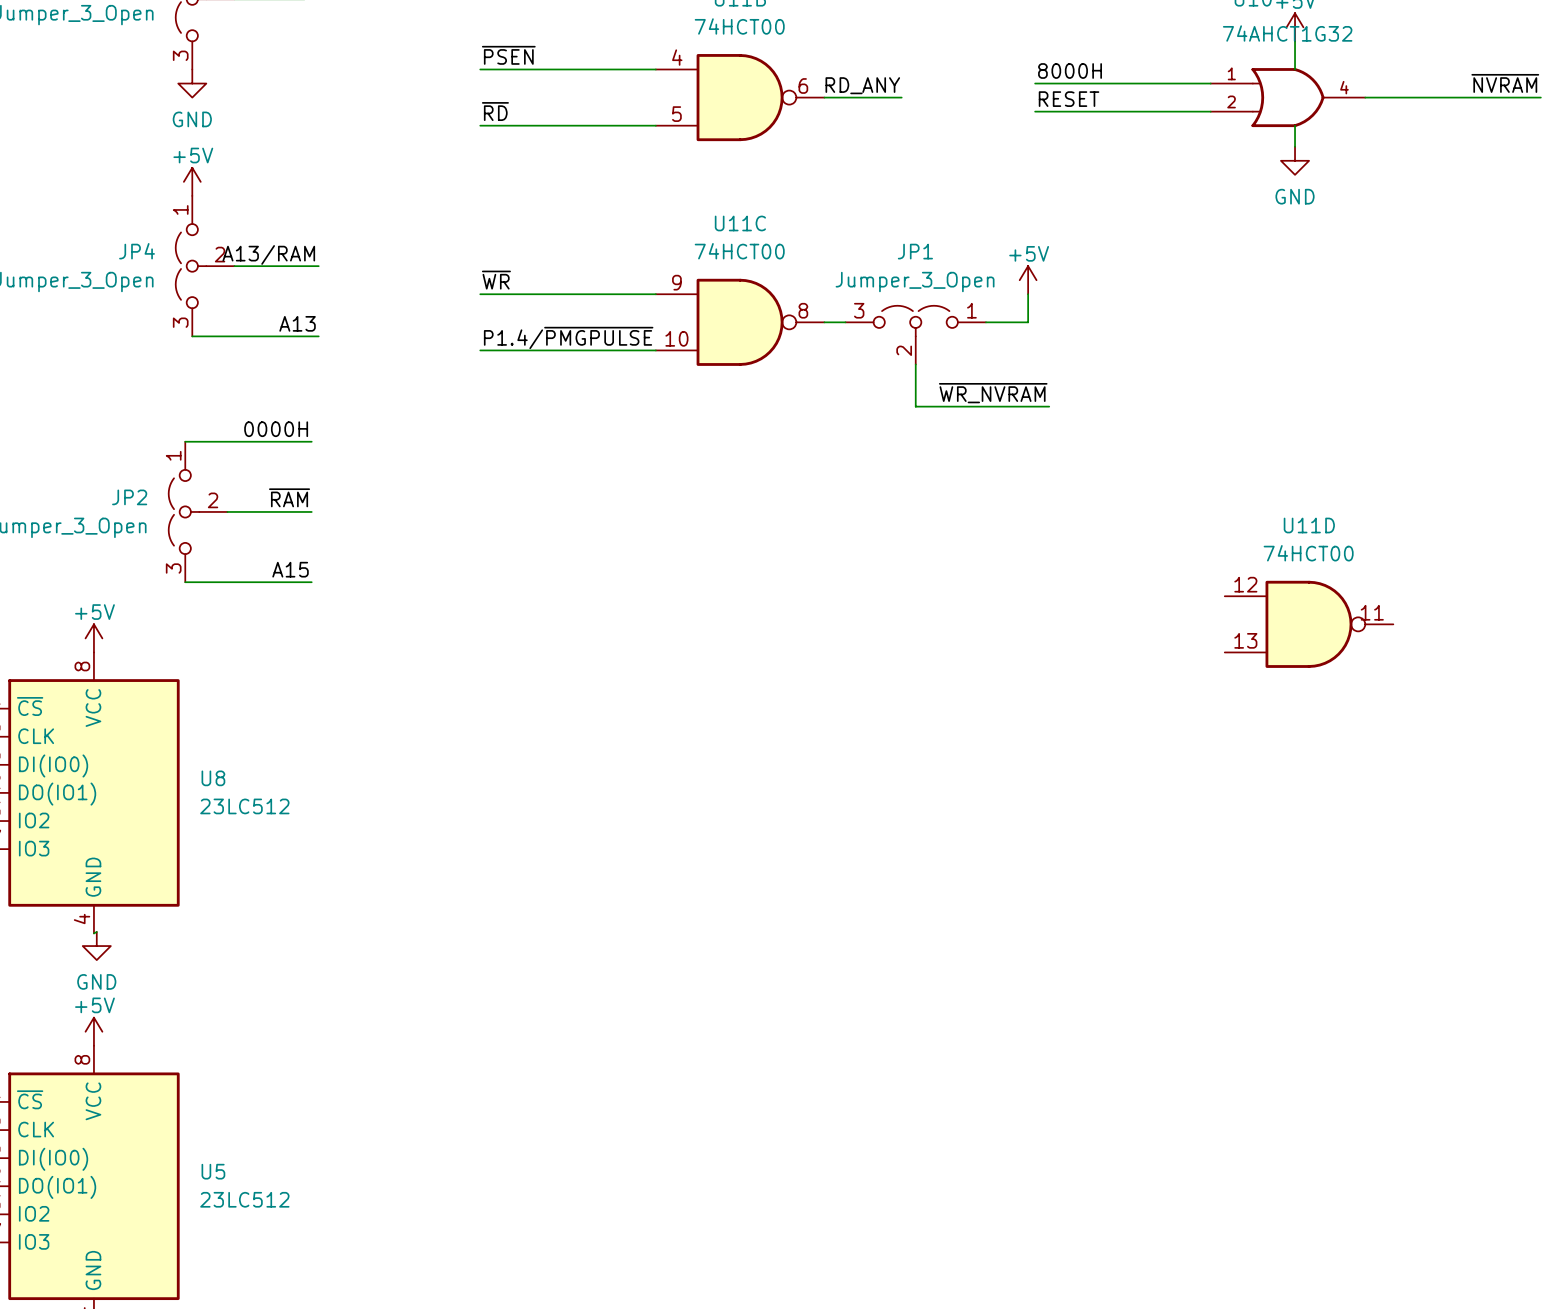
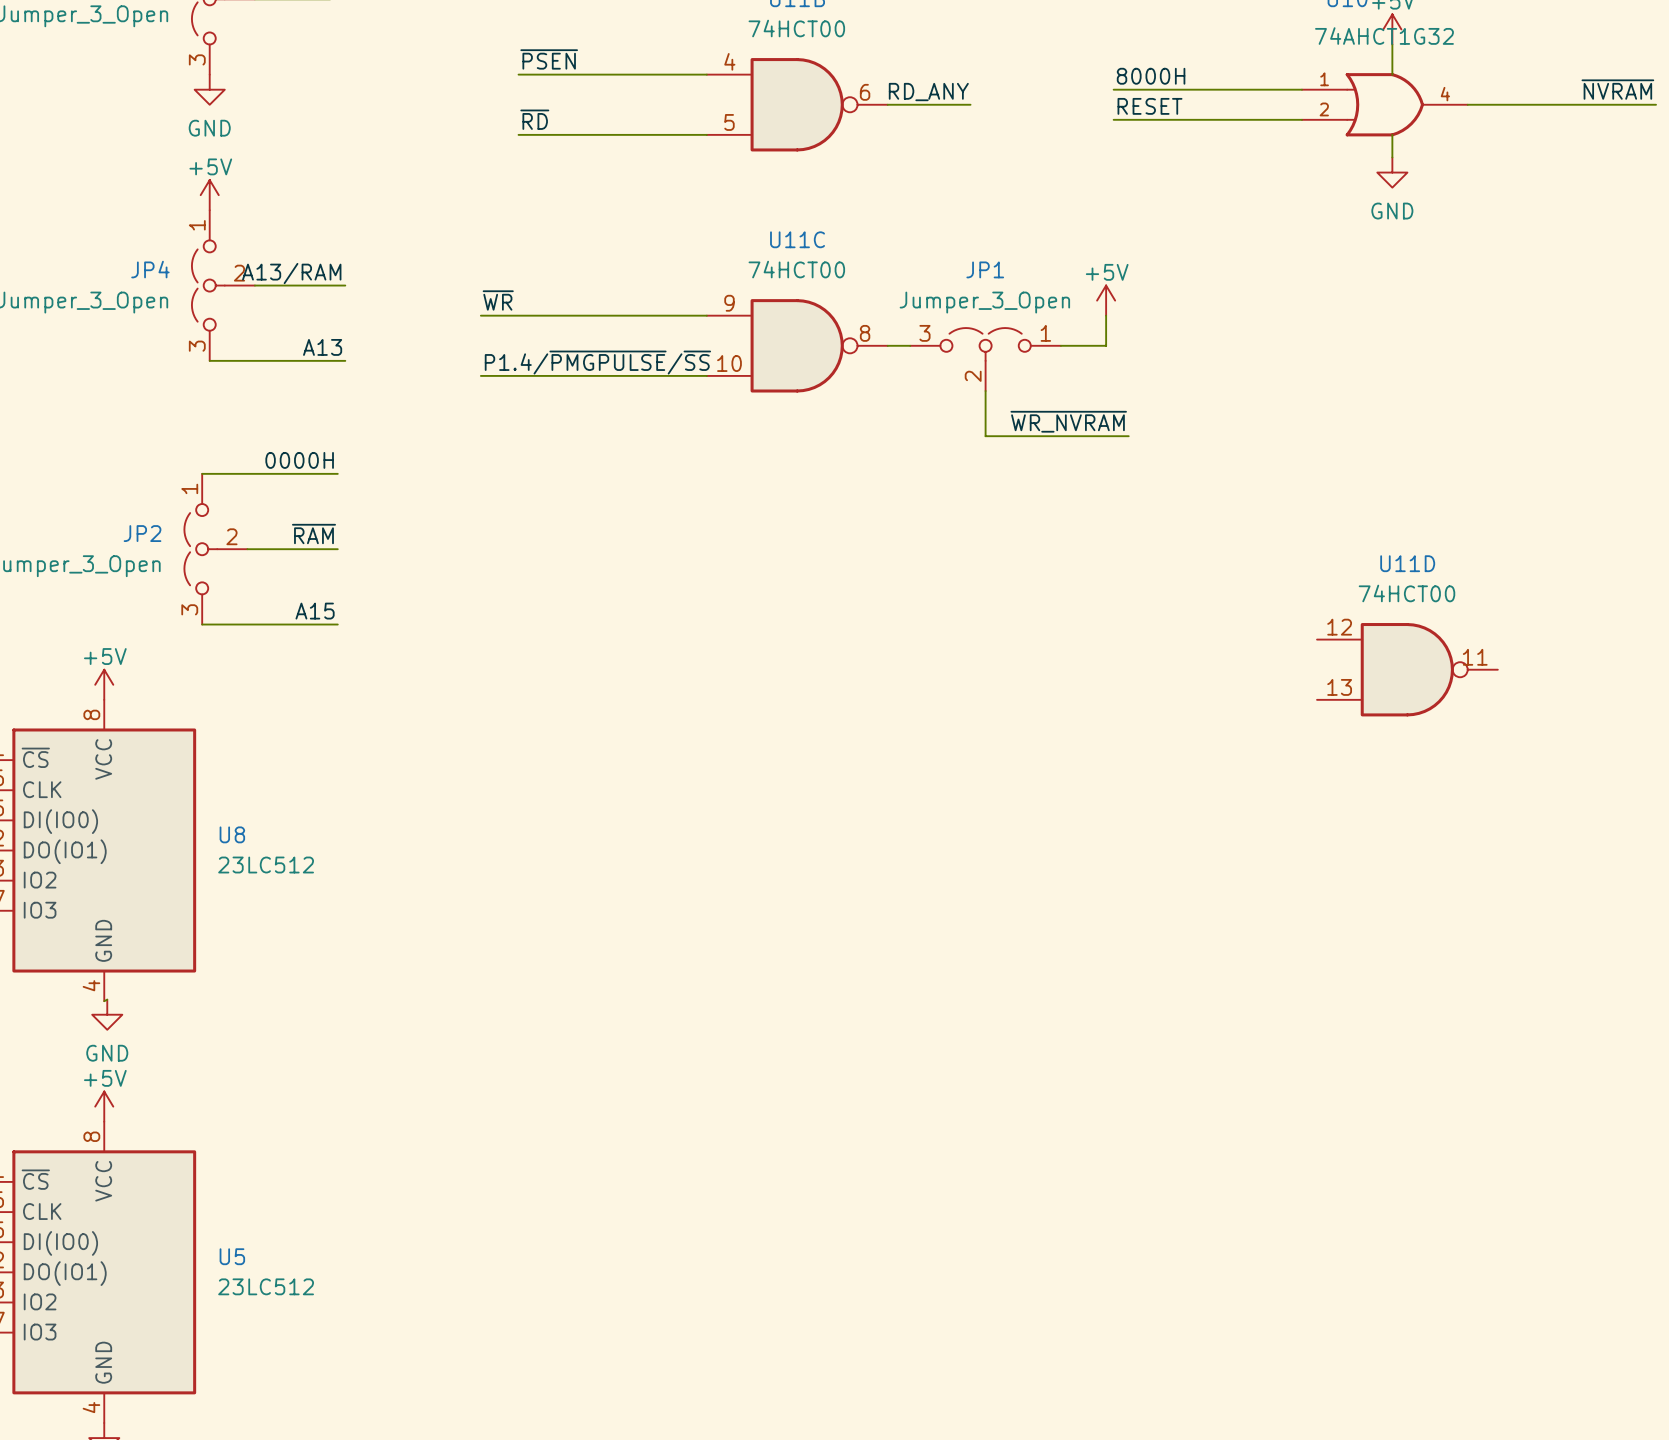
label position: ~{WR} (496, 280) -> ~{WR} (498, 300)
wire: none -> (480, 315) (518, 315)
label: P1.4/~{PMGPULSE} (568, 337) -> P1.4/~{PMGPULSE}/~{SS} (597, 362)
wire: none -> (480, 375) (518, 375)

